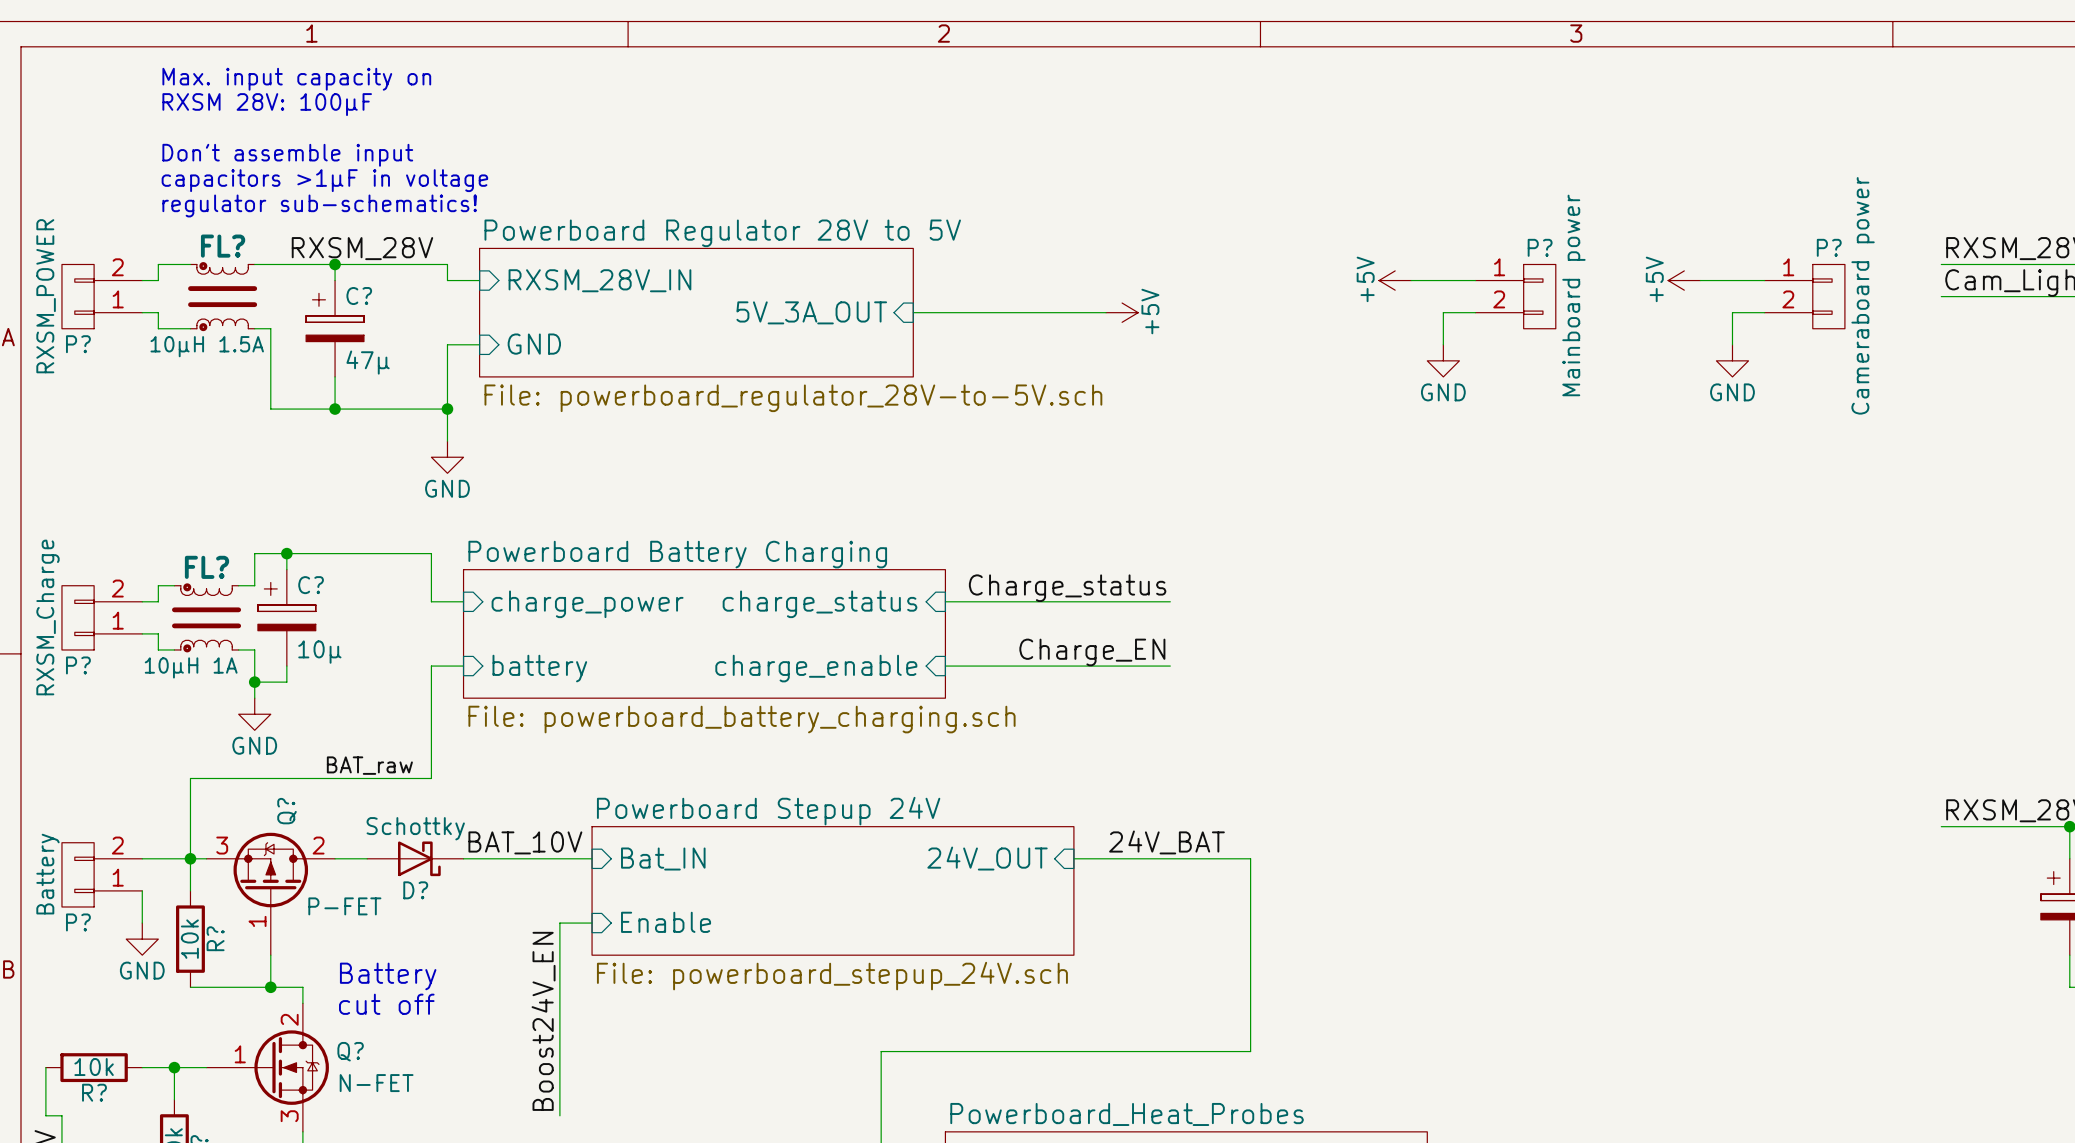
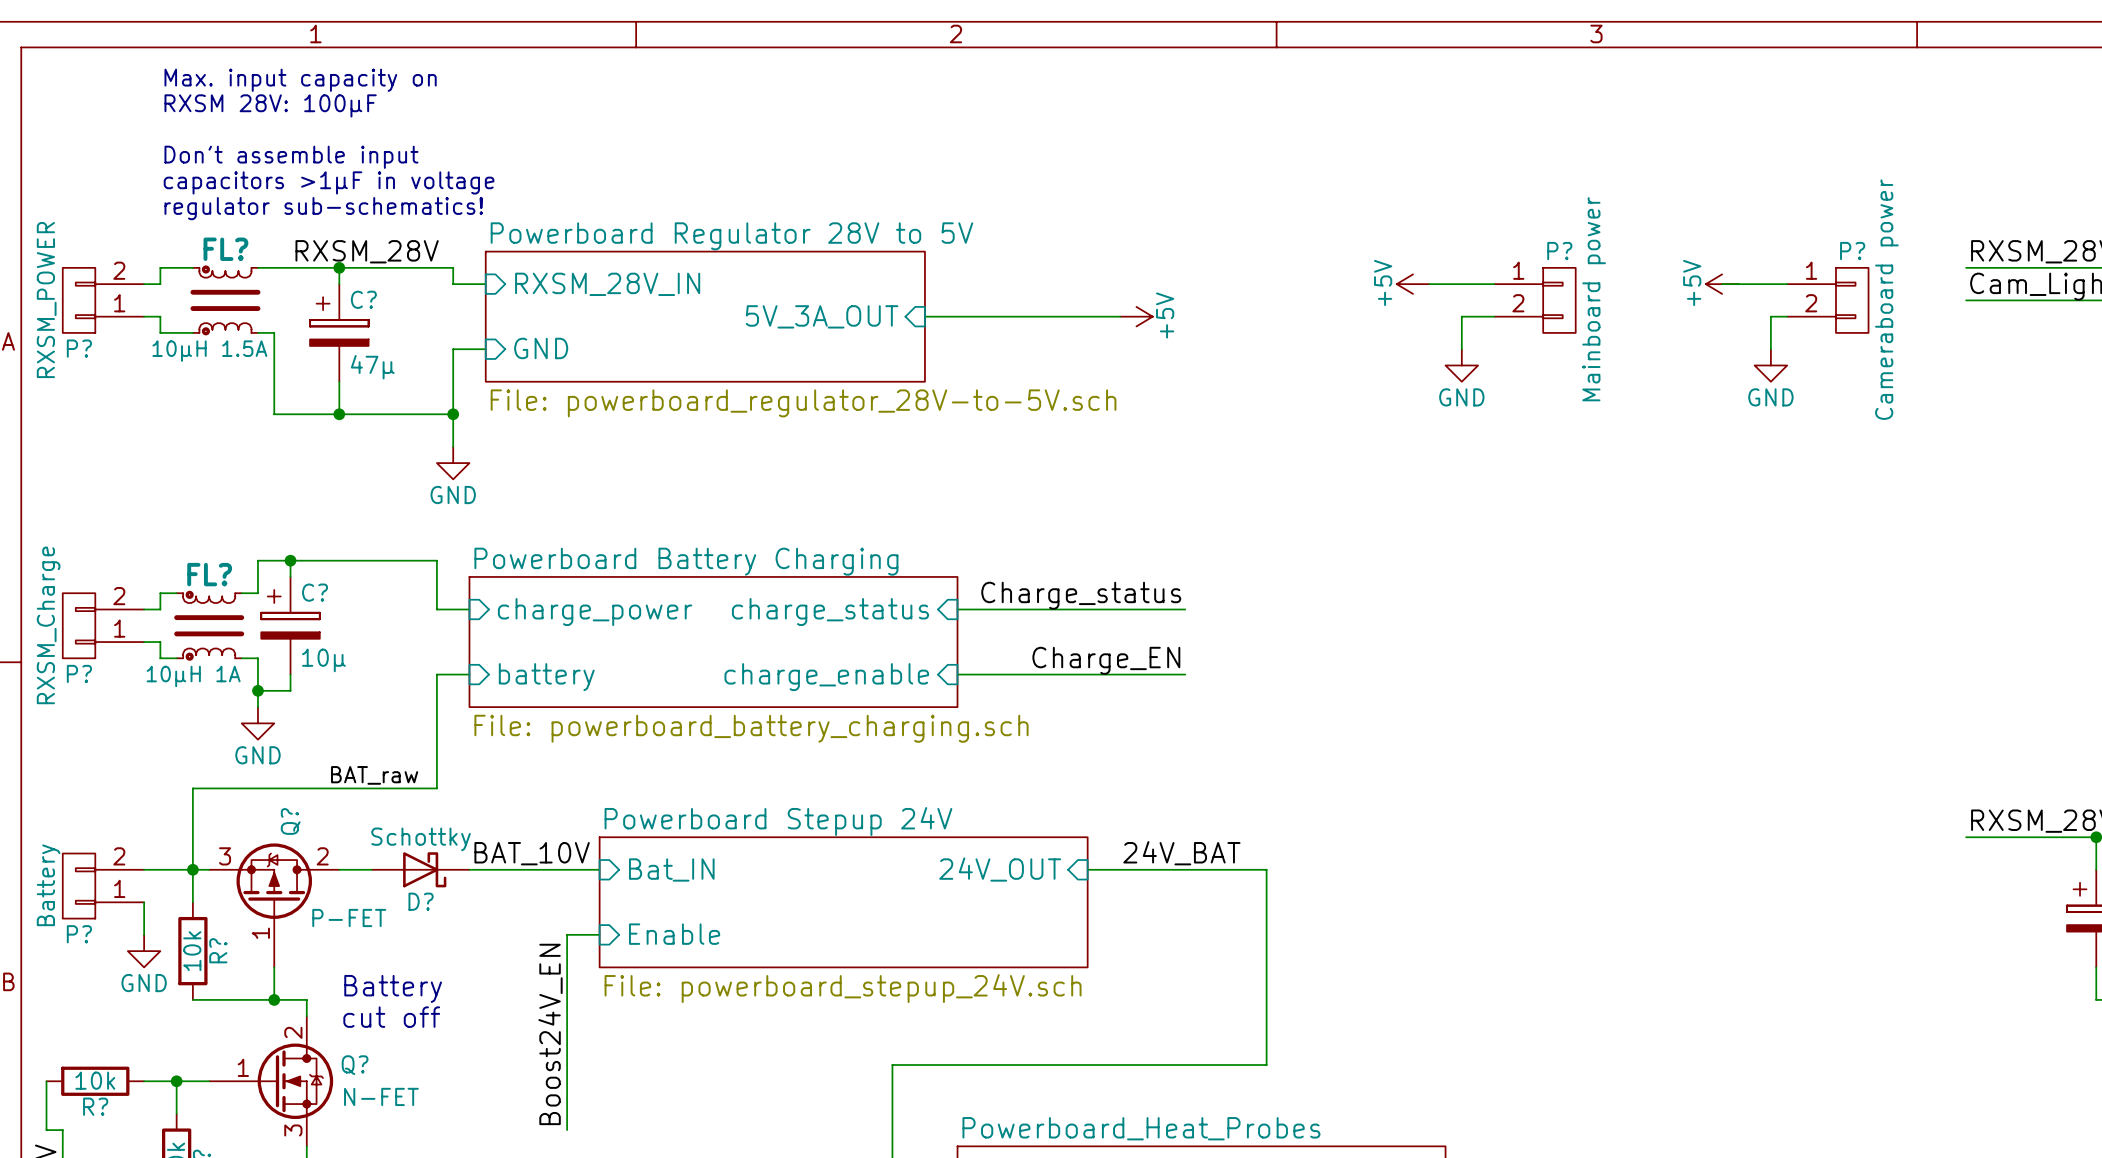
power symbol position: +5V (1684, 280) -> +5V (1722, 284)
wire: (1748, 312) (1732, 312) (1732, 344) -> (1770, 316) (1770, 349)
power symbol position: GND (1732, 360) -> GND (1770, 365)

